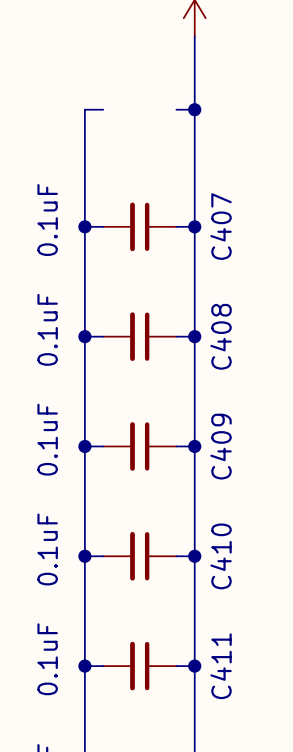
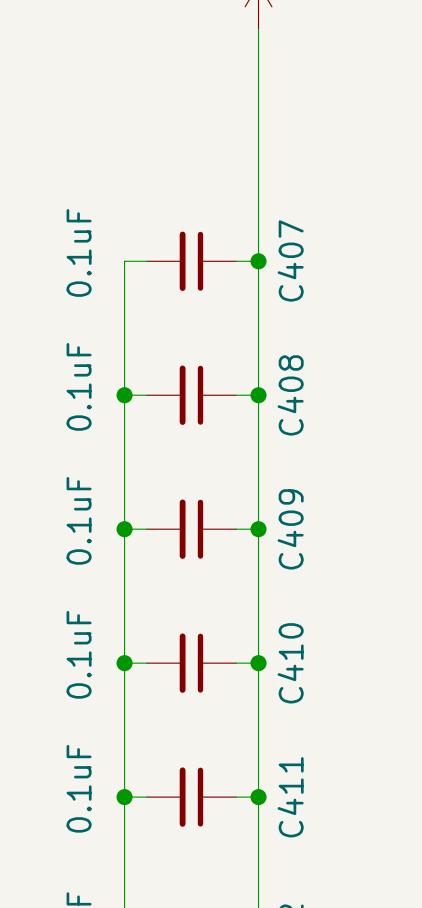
wire: (103, 109) (84, 109) (84, 226) -> none
wire: (176, 109) (194, 109) -> none
junction: (194, 109) -> none
junction: (84, 226) -> none

